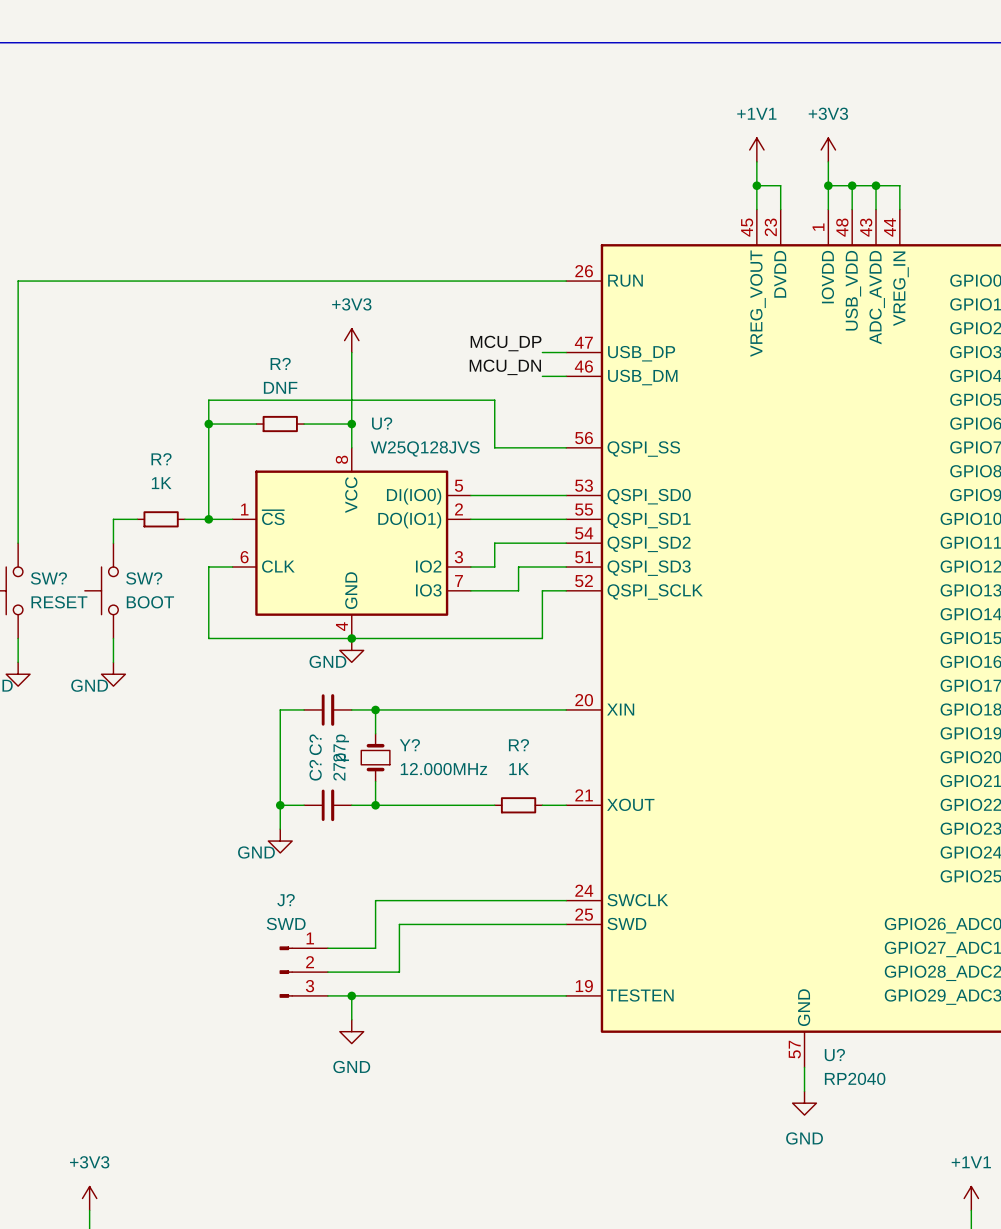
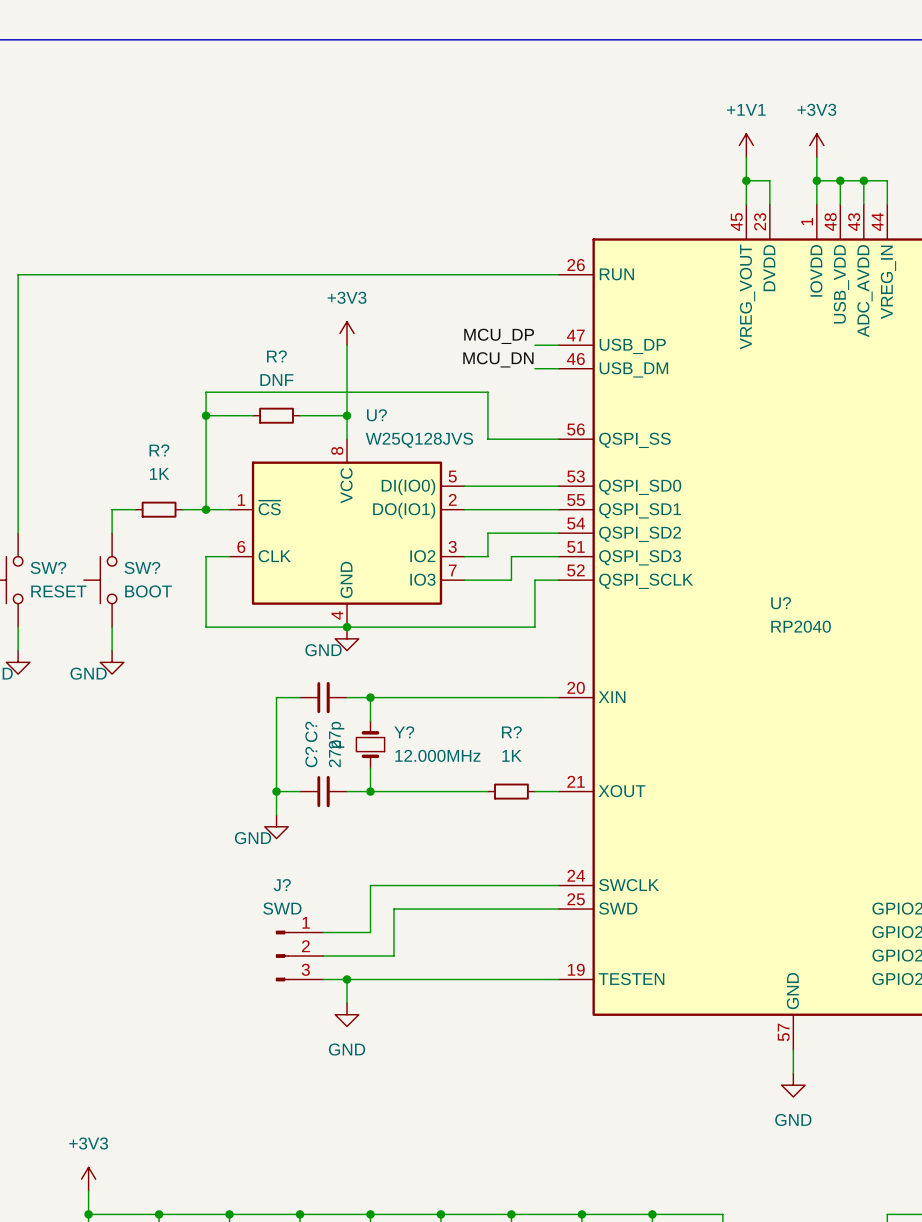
U? name position: U? (834, 1055) -> U? (781, 603)
U? value position: RP2040 (855, 1078) -> RP2040 (801, 626)

